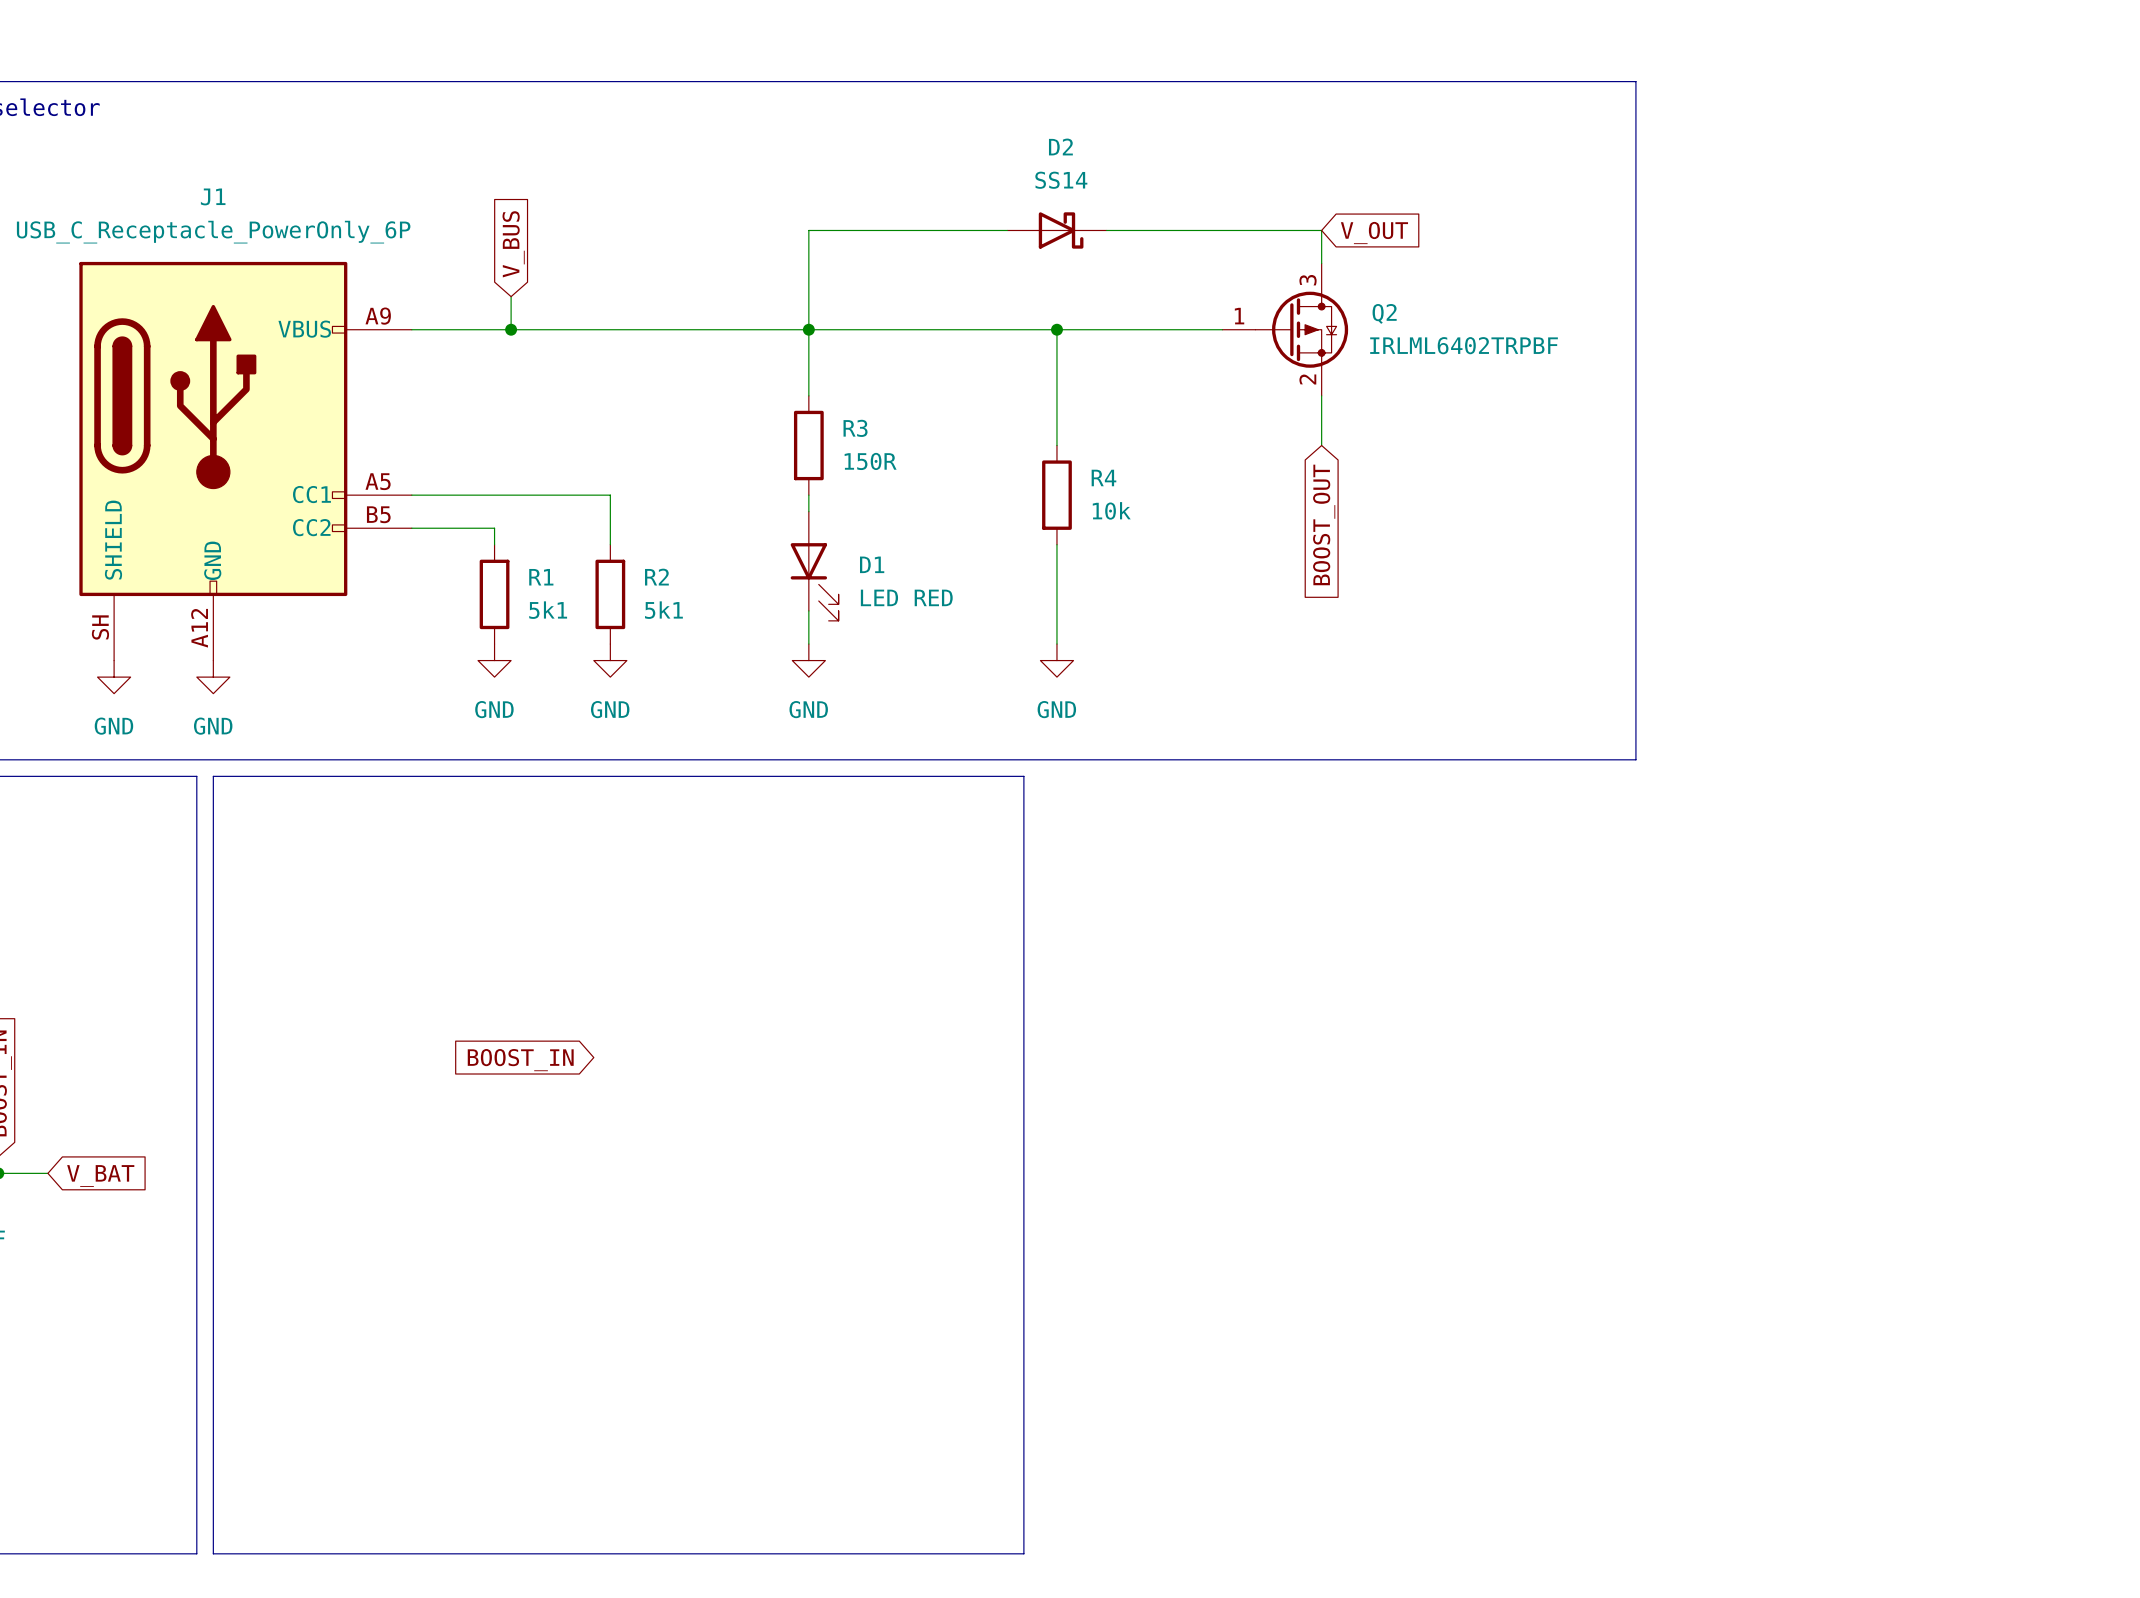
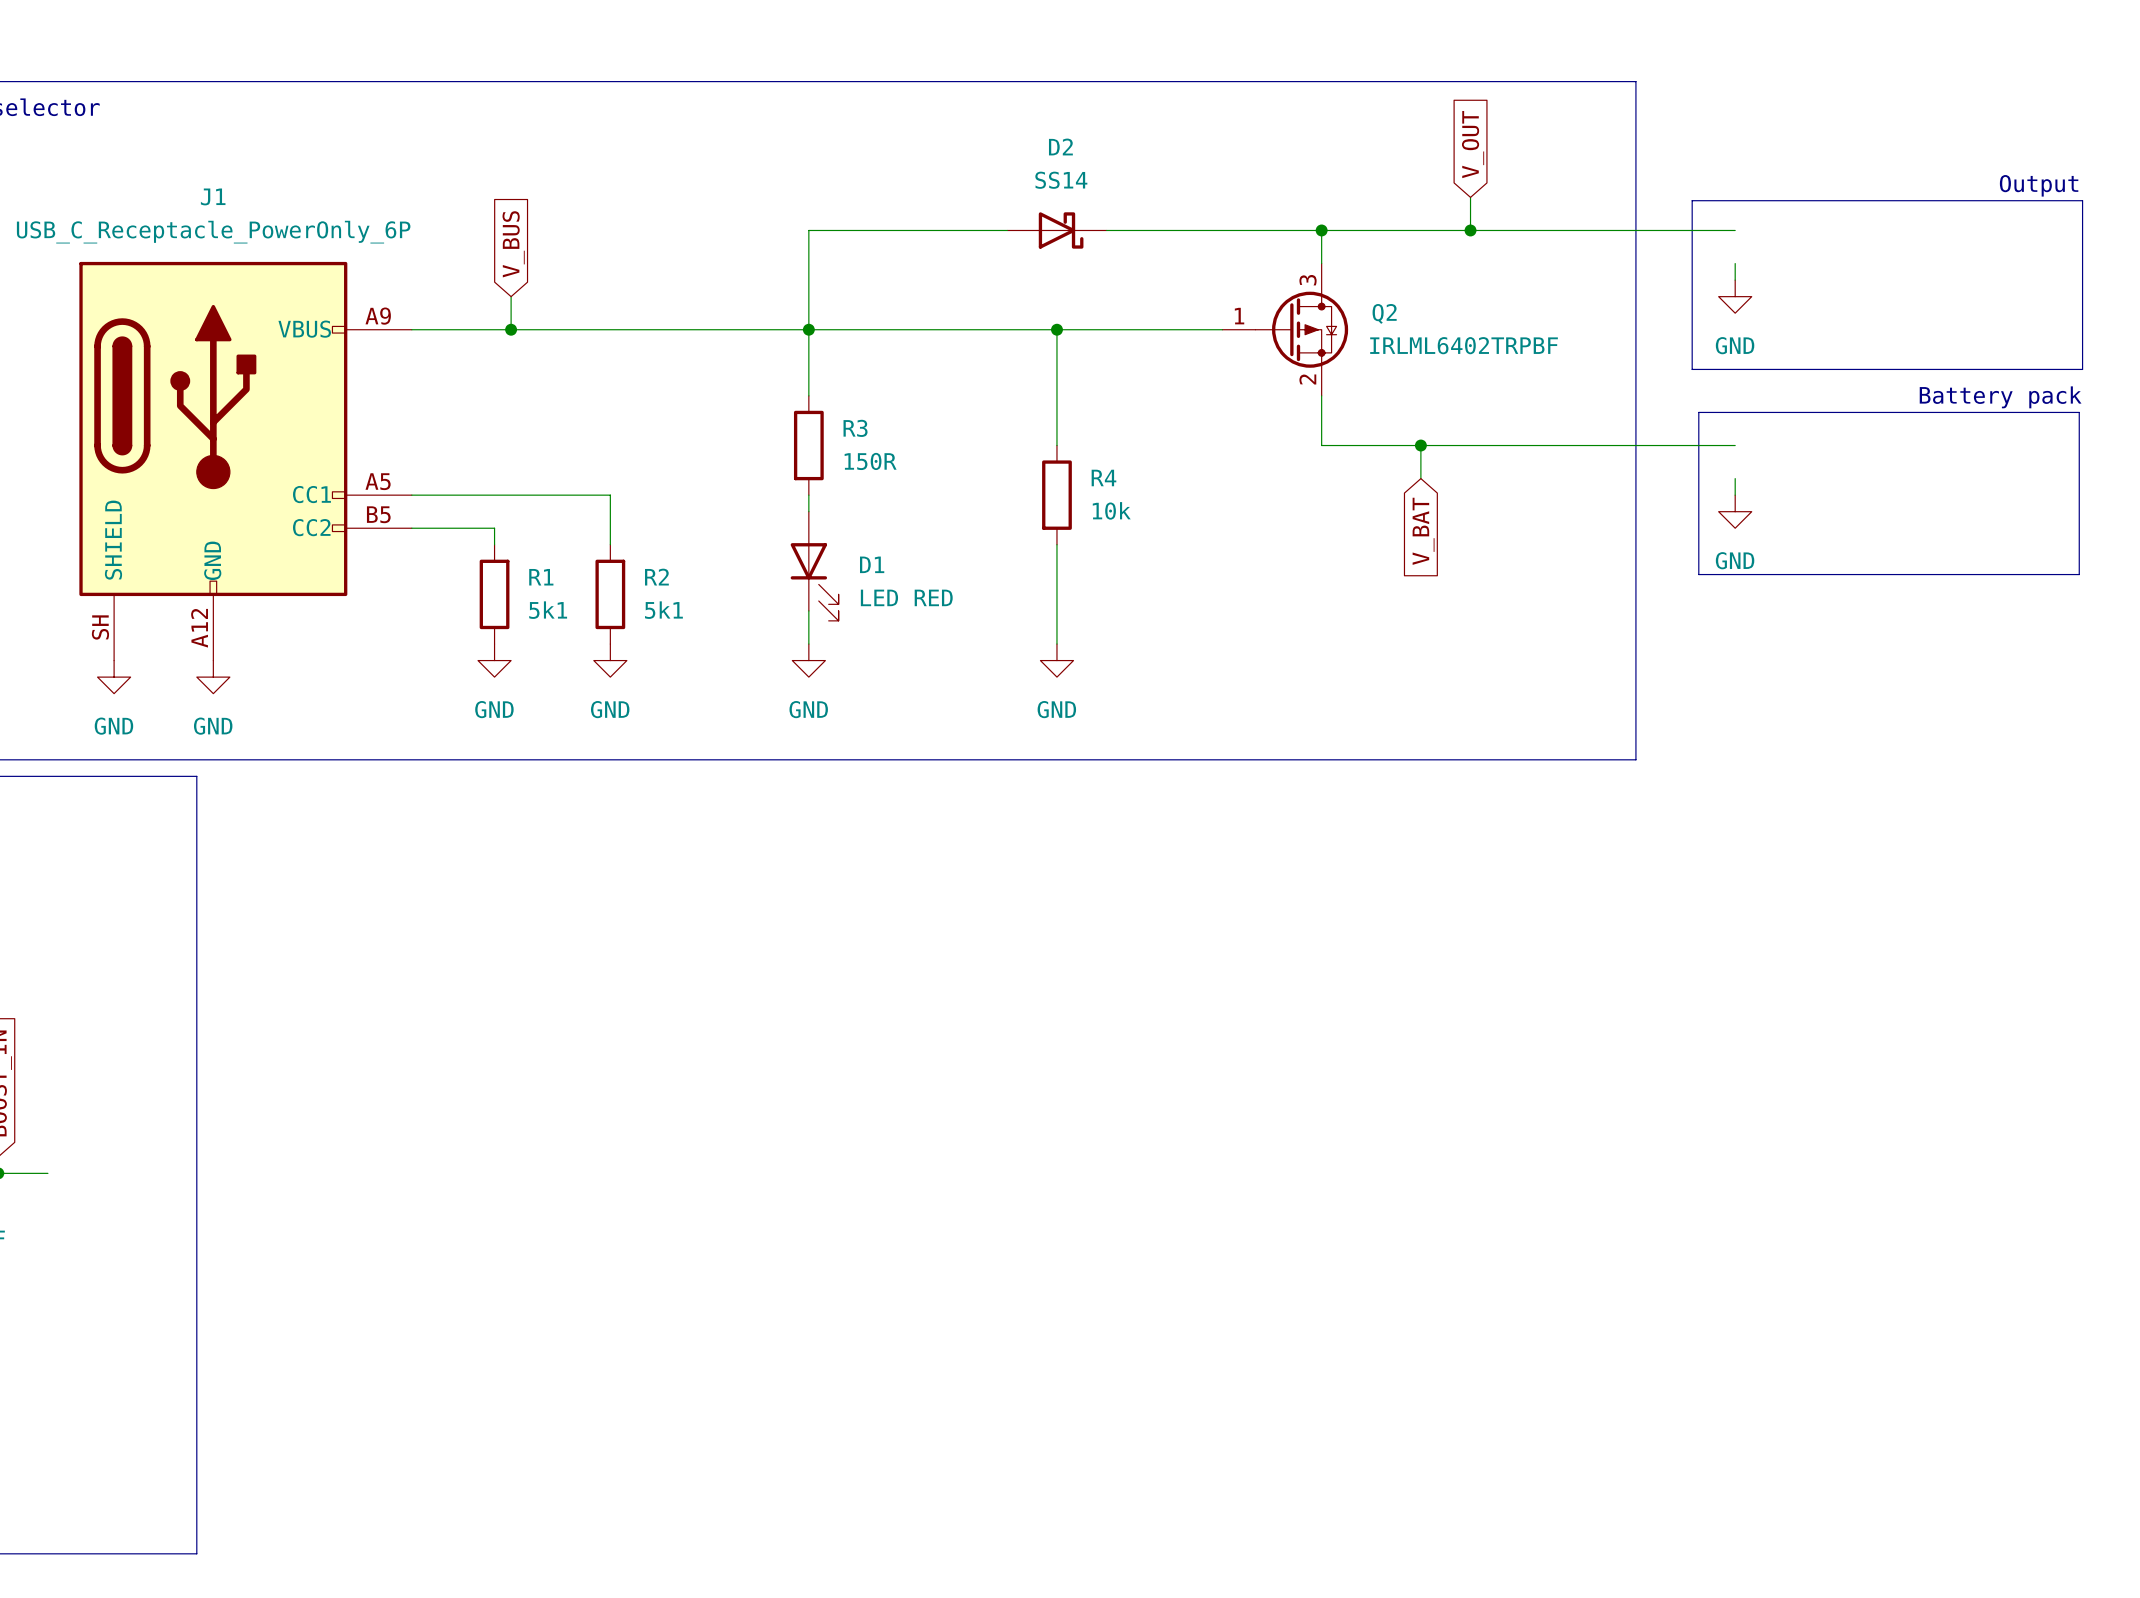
text: none -> Output (2039, 185)
wire: none -> (1470, 197) (1470, 230)
line: none -> (1692, 200) (2082, 200) (2082, 369) (1692, 369) (1692, 200)
wire: none -> (1321, 230) (1735, 230)
junction: none -> (1321, 230)
junction: none -> (1470, 230)
global label rotation: 0° (1374, 233) -> 90° counterclockwise (1473, 144)
global label position: V_OUT (1374, 233) -> V_OUT (1473, 144)
wire: none -> (1735, 263) (1735, 280)
power symbol: none -> GND (1735, 296)
text: none -> Battery pack (2000, 397)
line: none -> (1698, 412) (2079, 412) (2079, 574) (1698, 574) (1698, 412)
wire: none -> (1321, 445) (1735, 445)
wire: none -> (1420, 445) (1420, 478)
junction: none -> (1420, 445)
wire: none -> (1735, 478) (1735, 495)
power symbol: none -> GND (1735, 511)
global label: BOOST_OUT (1324, 524) -> none
global label: none -> V_BAT (1423, 531)
line: (213, 776) (1023, 776) (1023, 1553) (213, 1553) (213, 776) -> none
global label: BOOST_IN (520, 1060) -> none
global label: V_BAT (100, 1176) -> none

